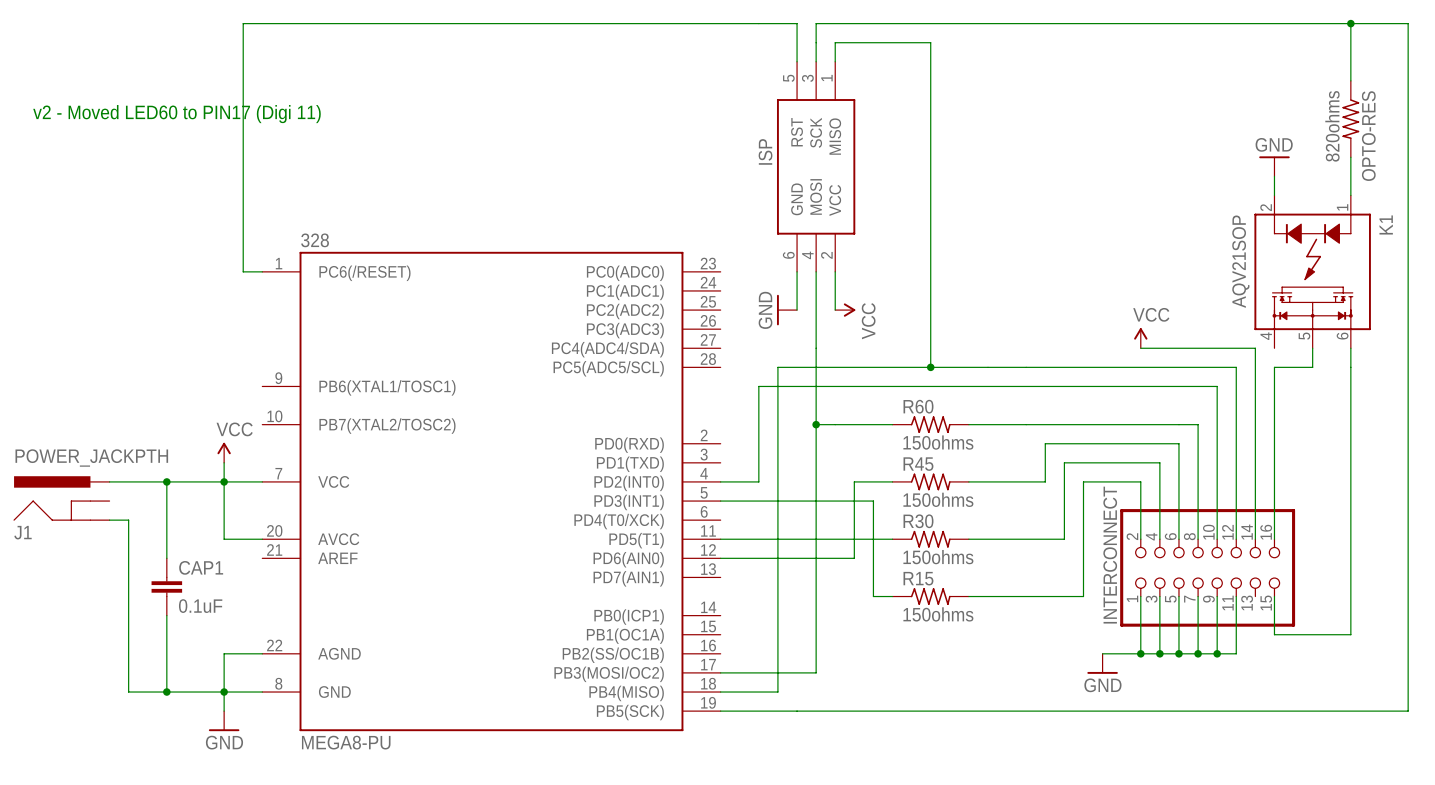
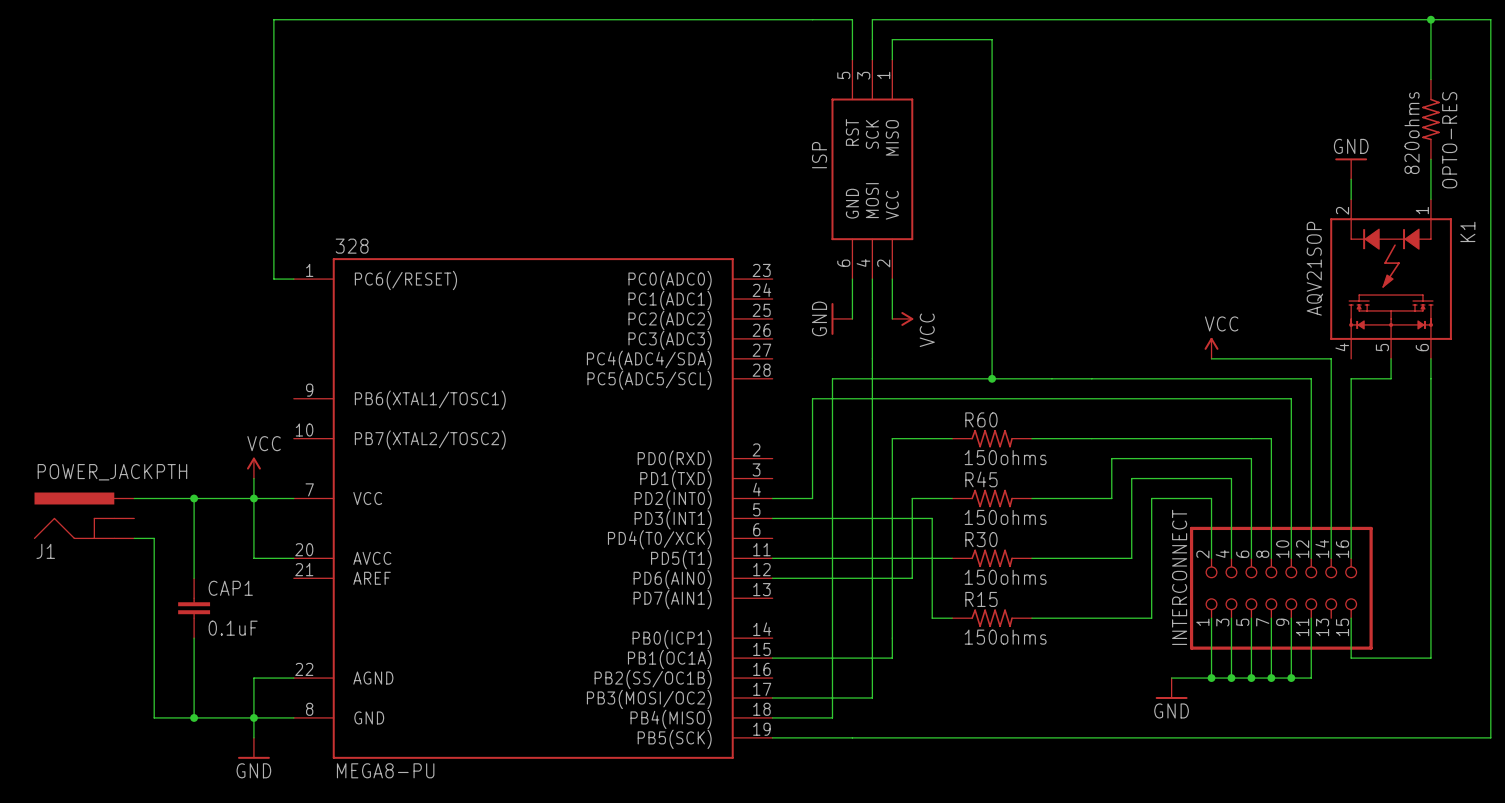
text: v2 - Moved LED60 to PIN17 (Digi 11) (176, 114) -> none
wire: (816, 424) (835, 424) -> (772, 658) (892, 658) (892, 438)
junction: (816, 424) -> none

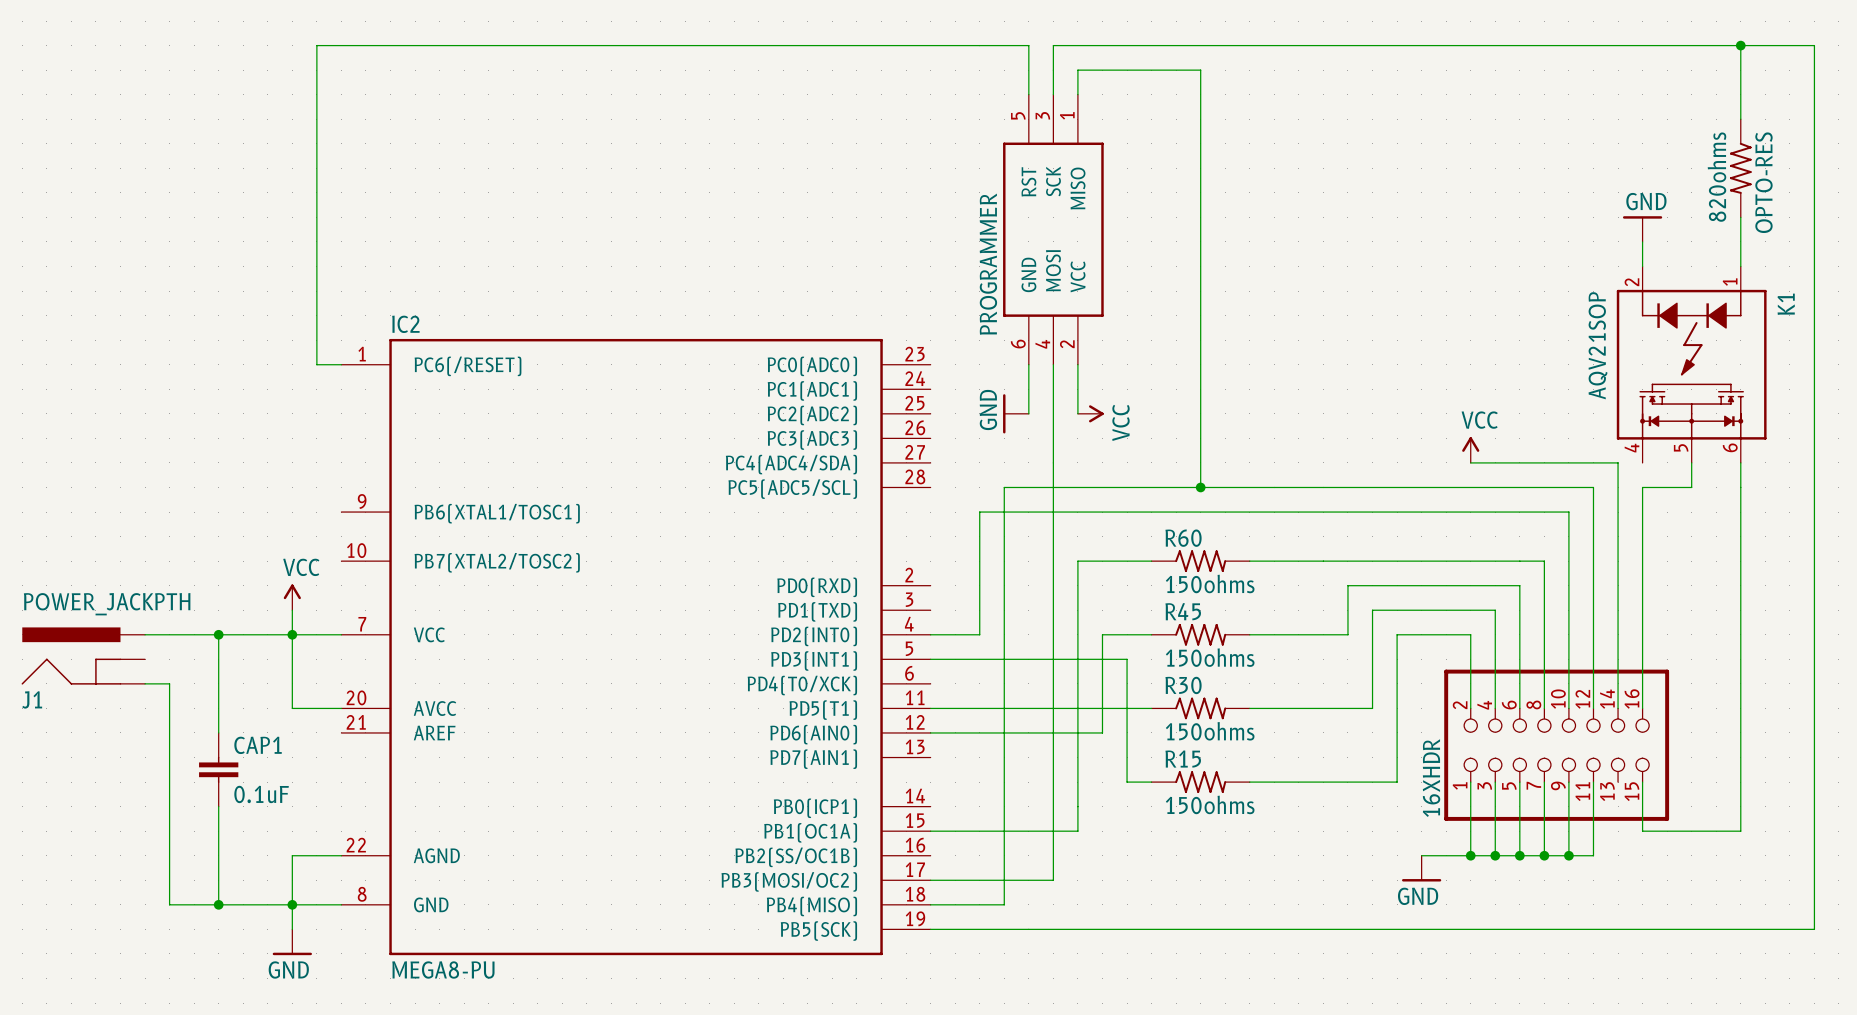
ISP name: ISP (819, 155) -> PROGRAMMER (988, 264)
328 name: 328 (352, 246) -> IC2 (405, 324)
INTERCONNECT name: INTERCONNECT (1179, 577) -> 16XHDR (1431, 778)

